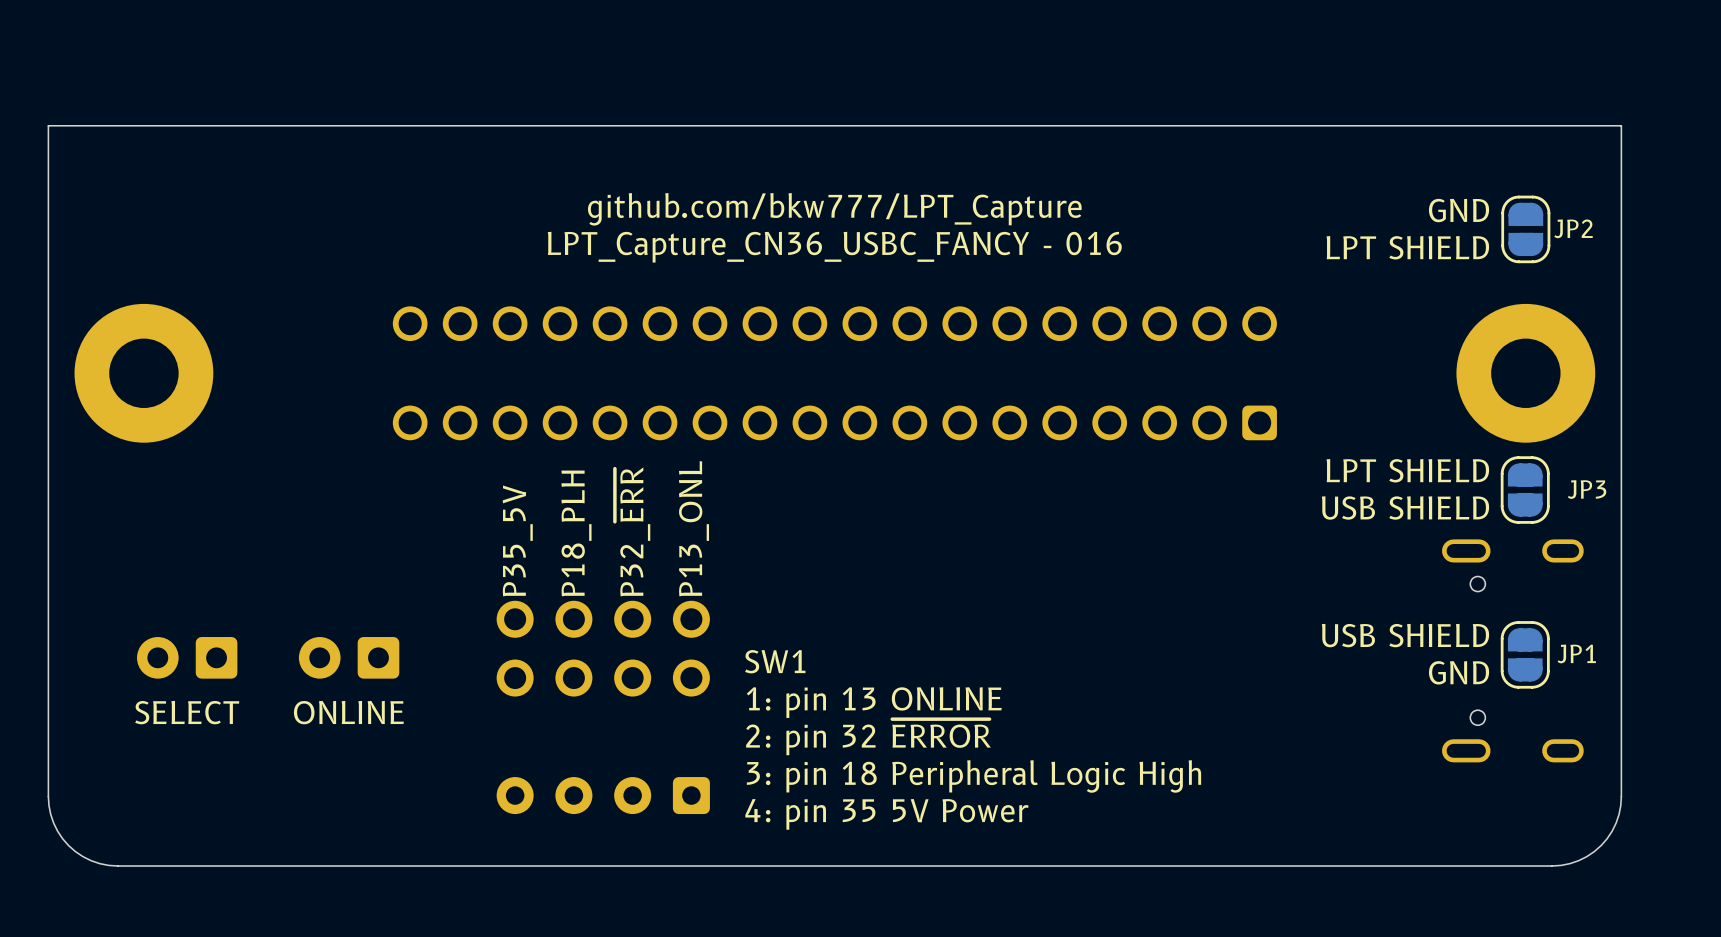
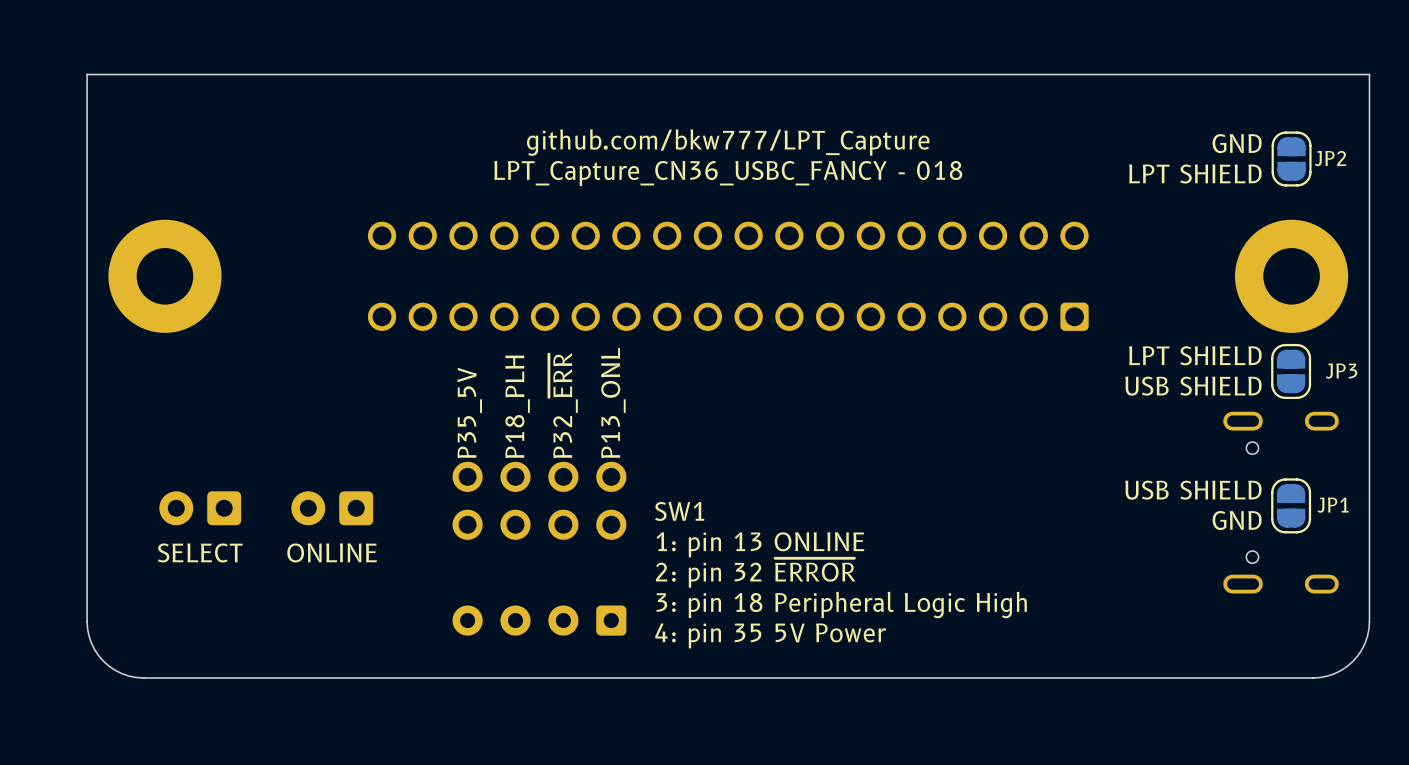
text: LPT_Capture_CN36_USBC_FANCY - 016 (834, 247) -> LPT_Capture_CN36_USBC_FANCY - 018 (728, 173)

